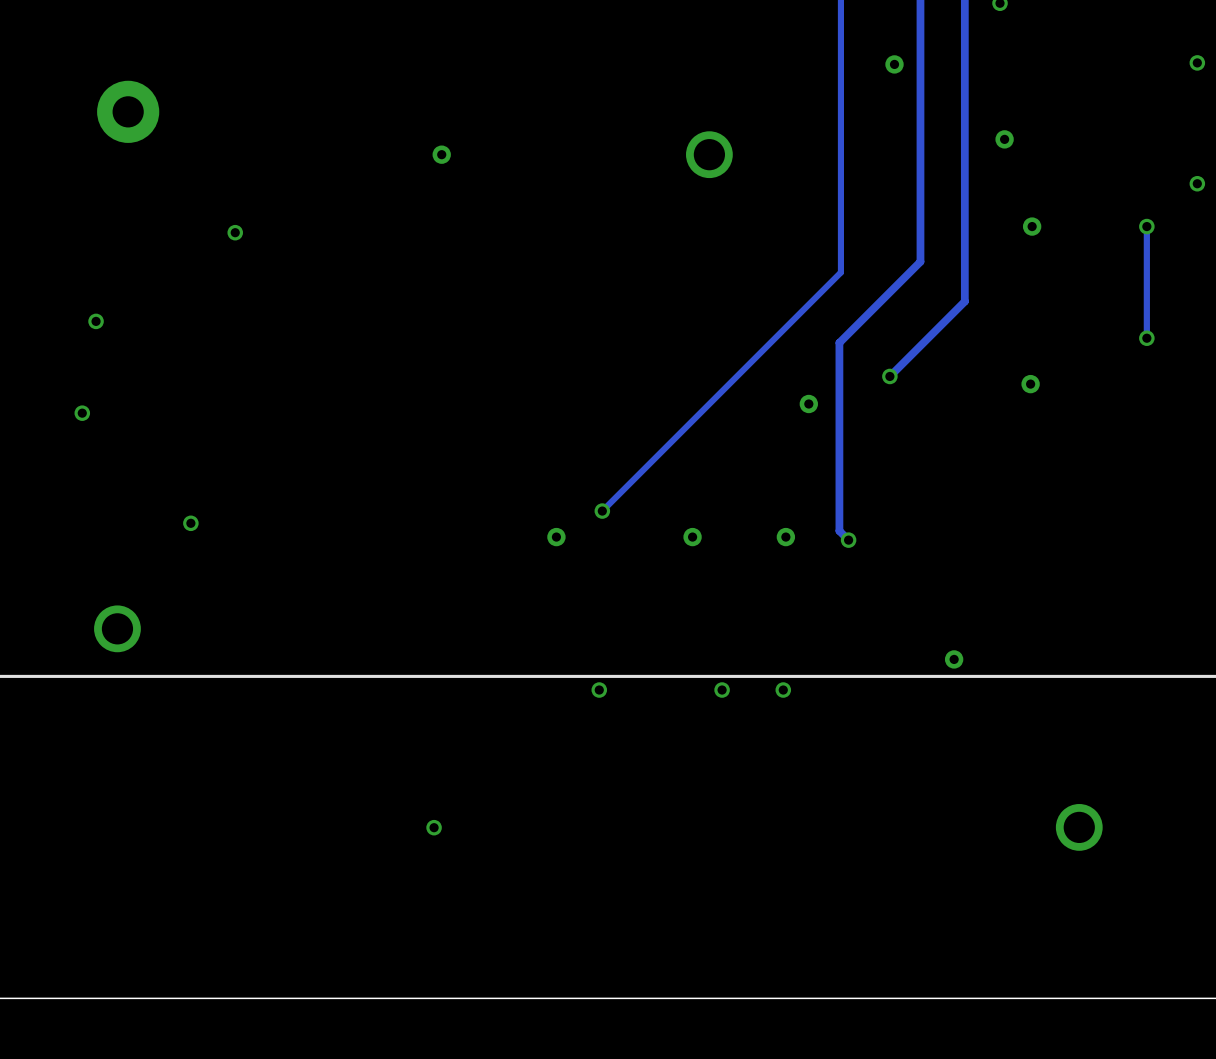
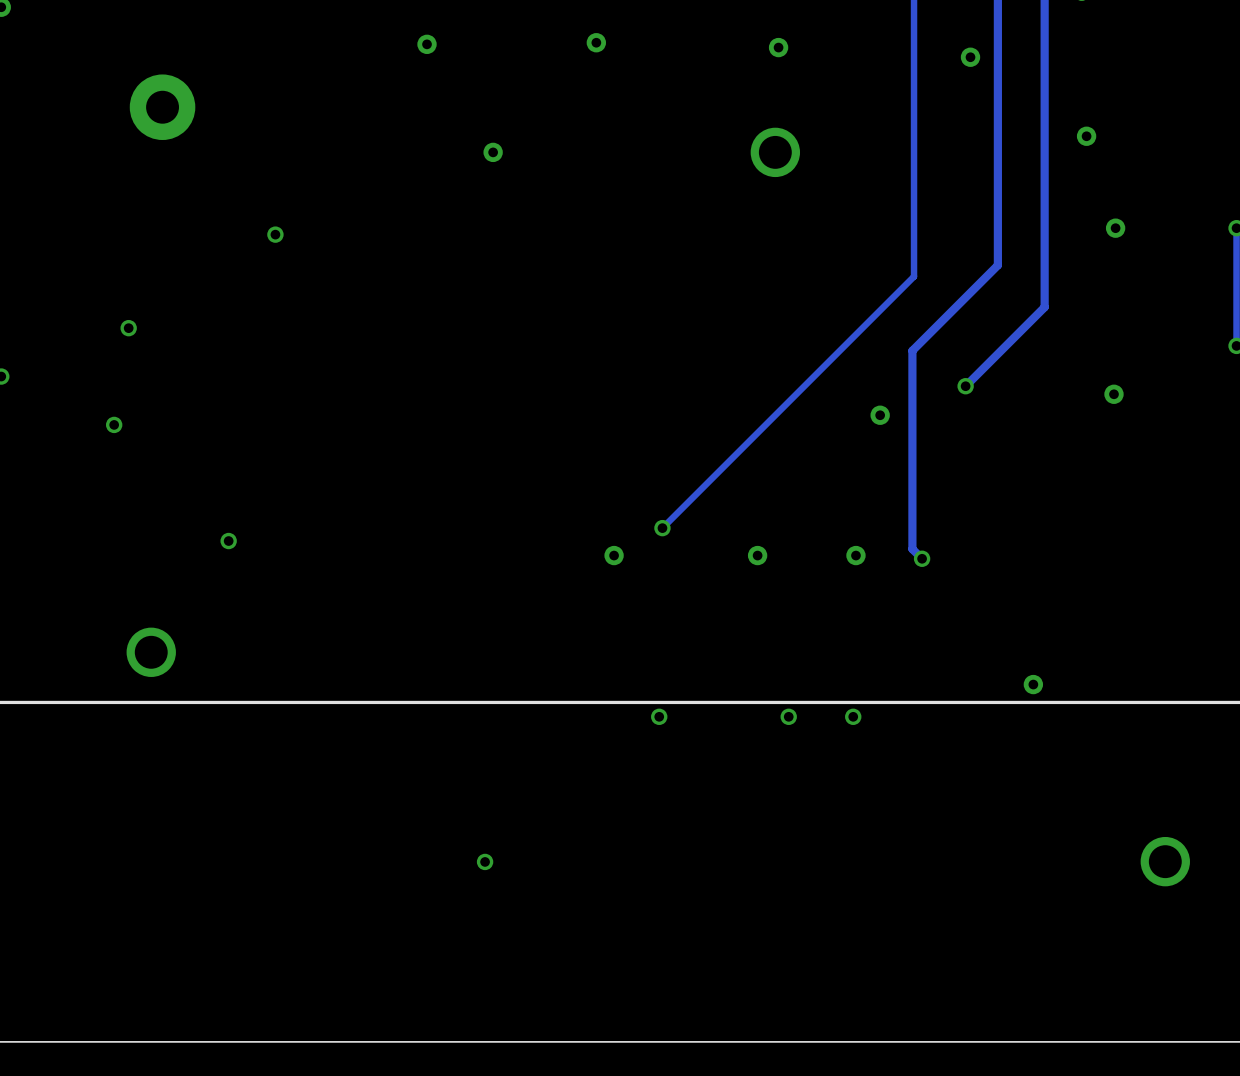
via: none -> (596, 42)
via: none -> (427, 44)
via: none -> (778, 47)

